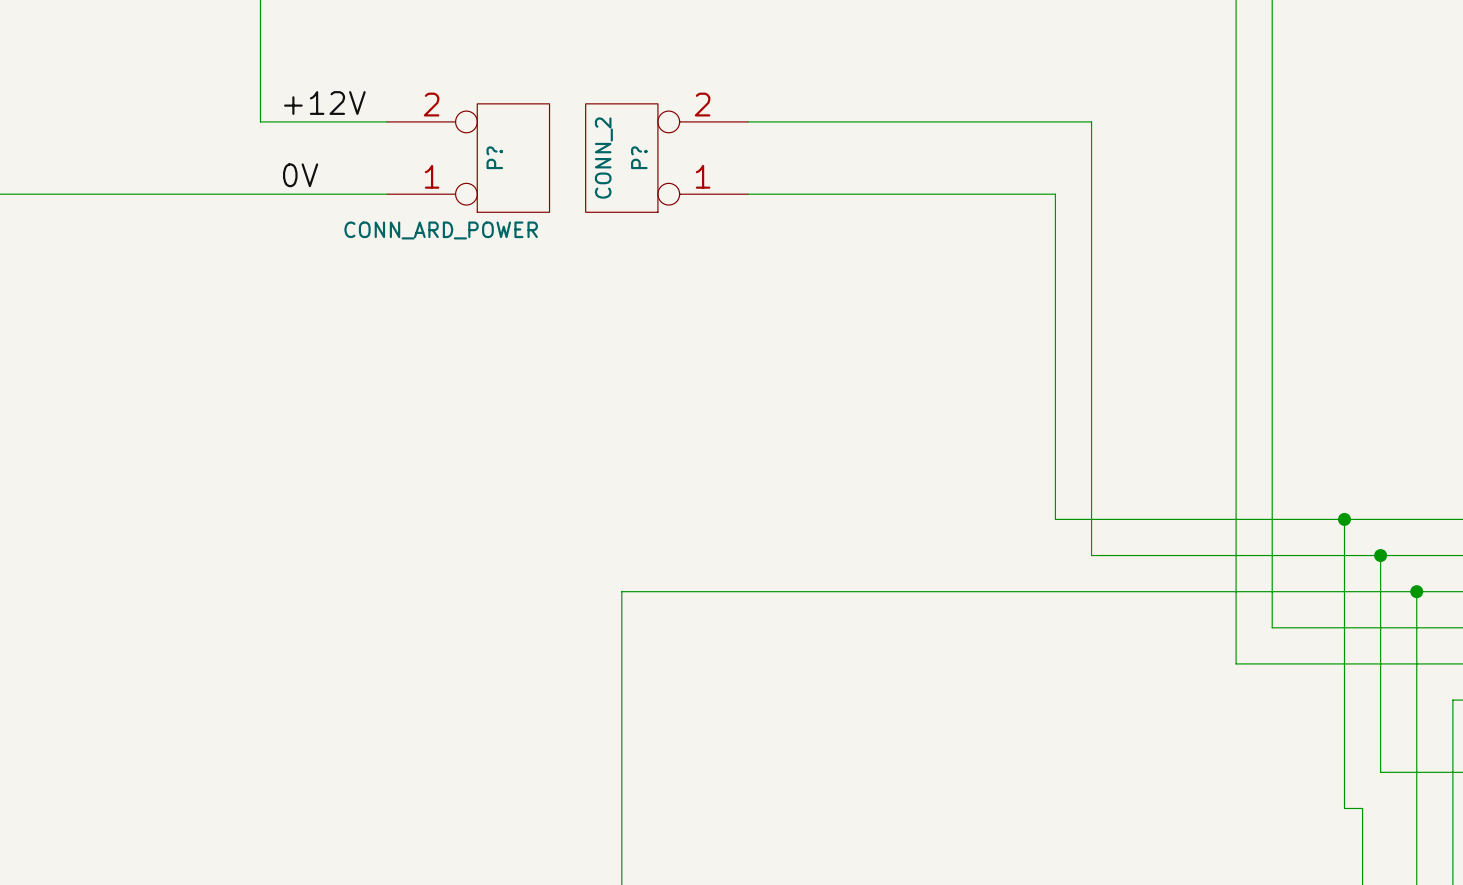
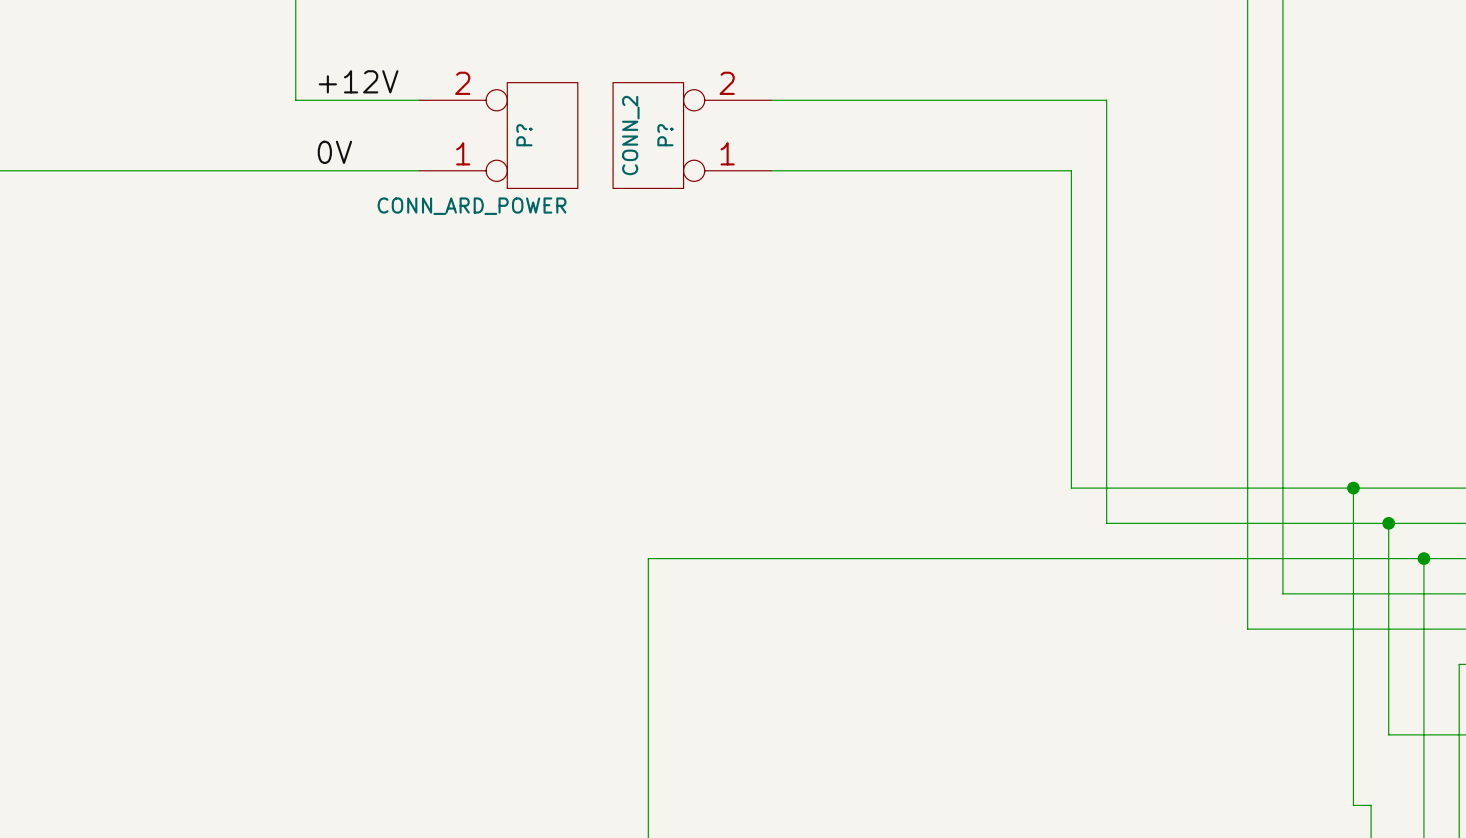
wire: (1344, 808) (1362, 808) (1362, 844) -> (1353, 770) (1353, 805) (1371, 805)

